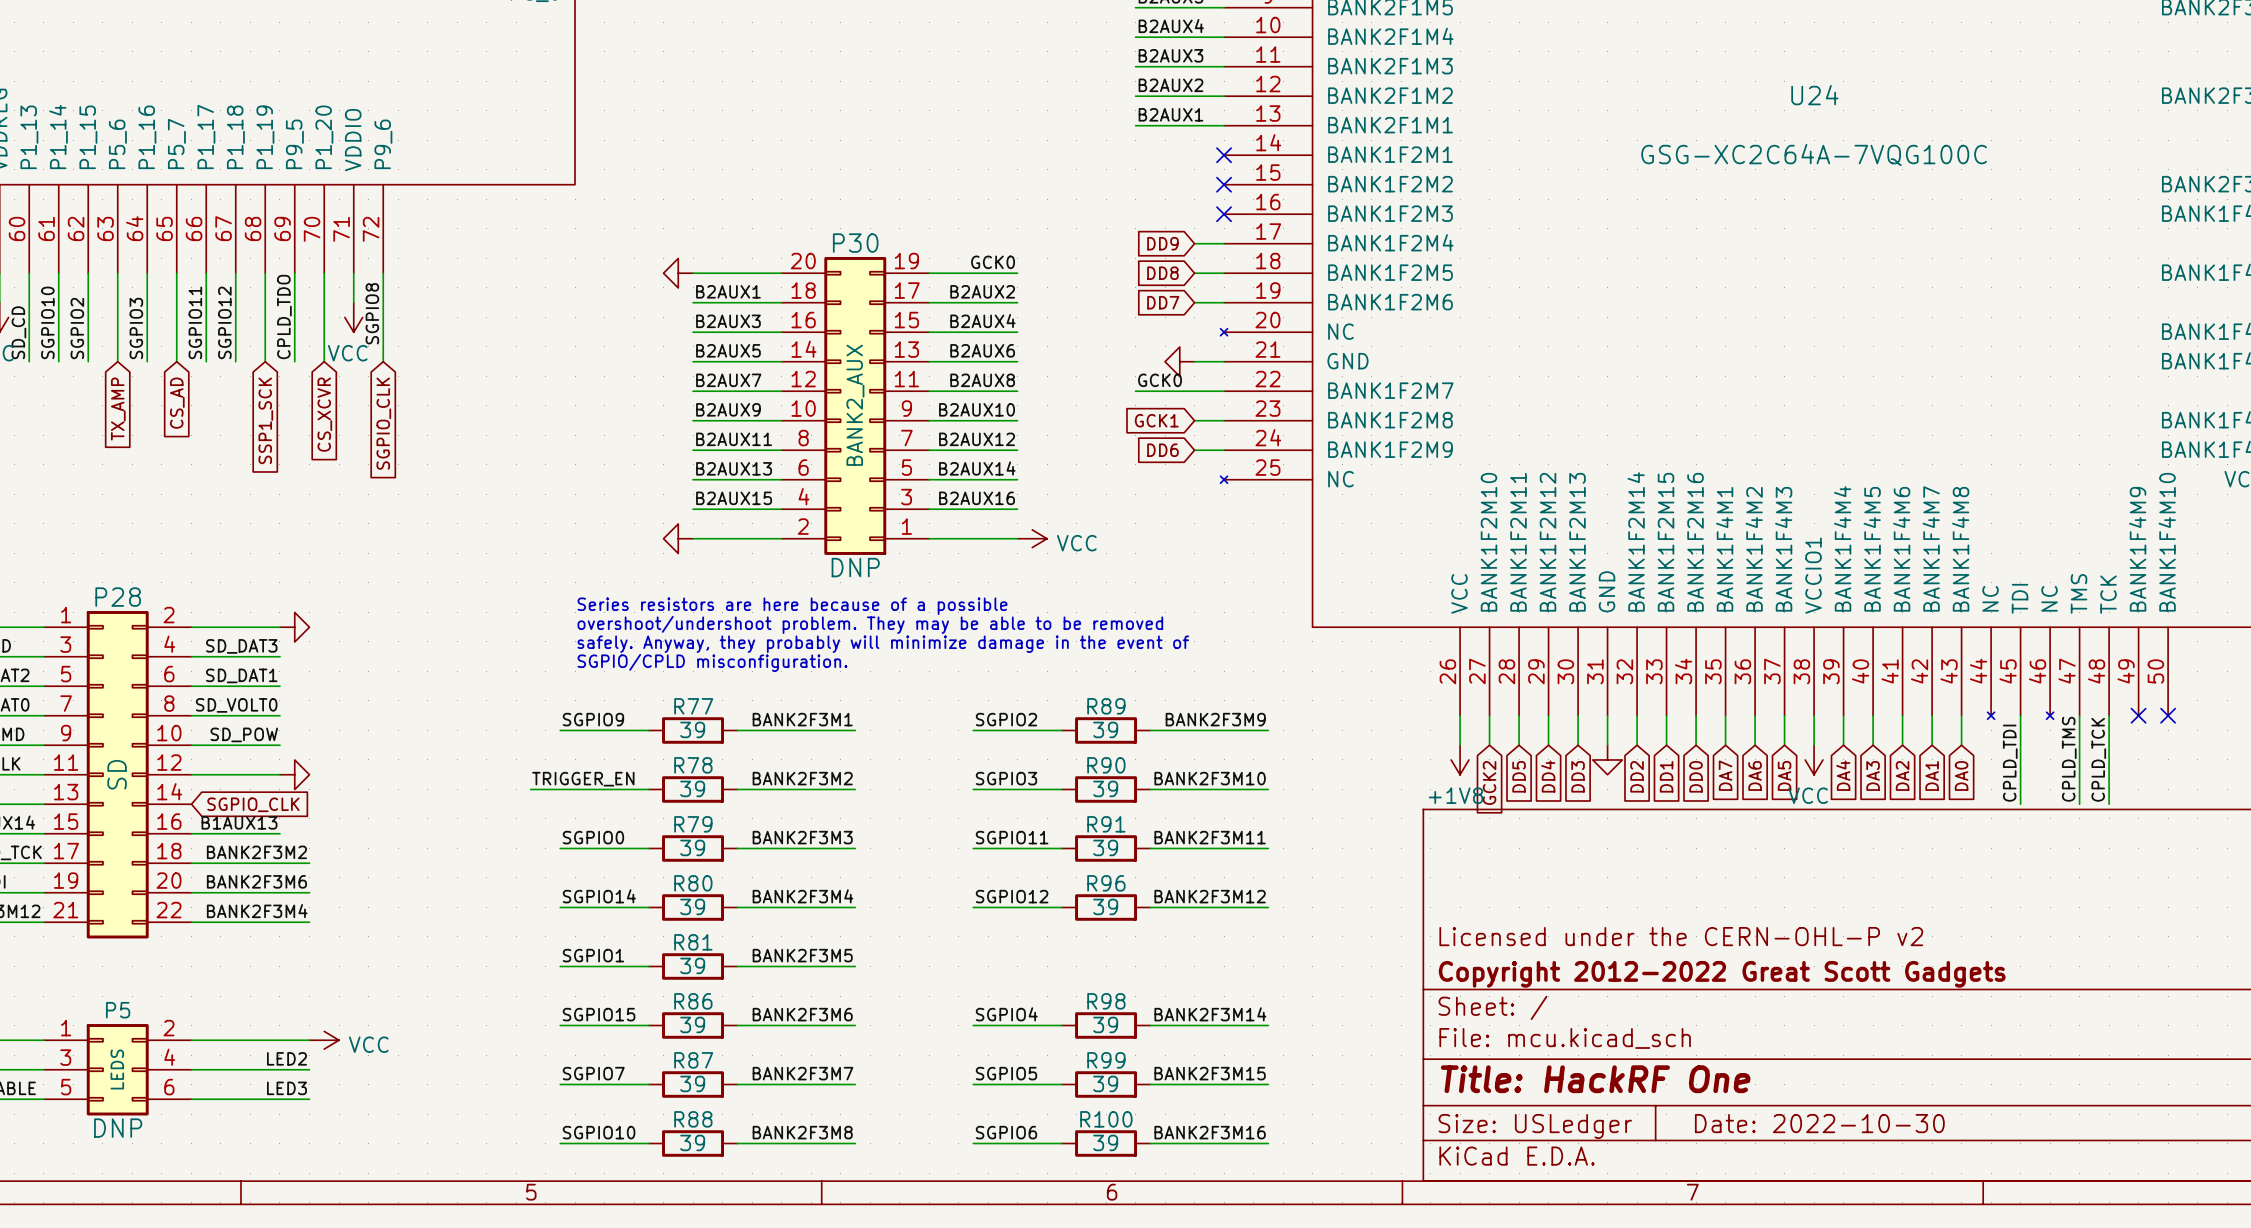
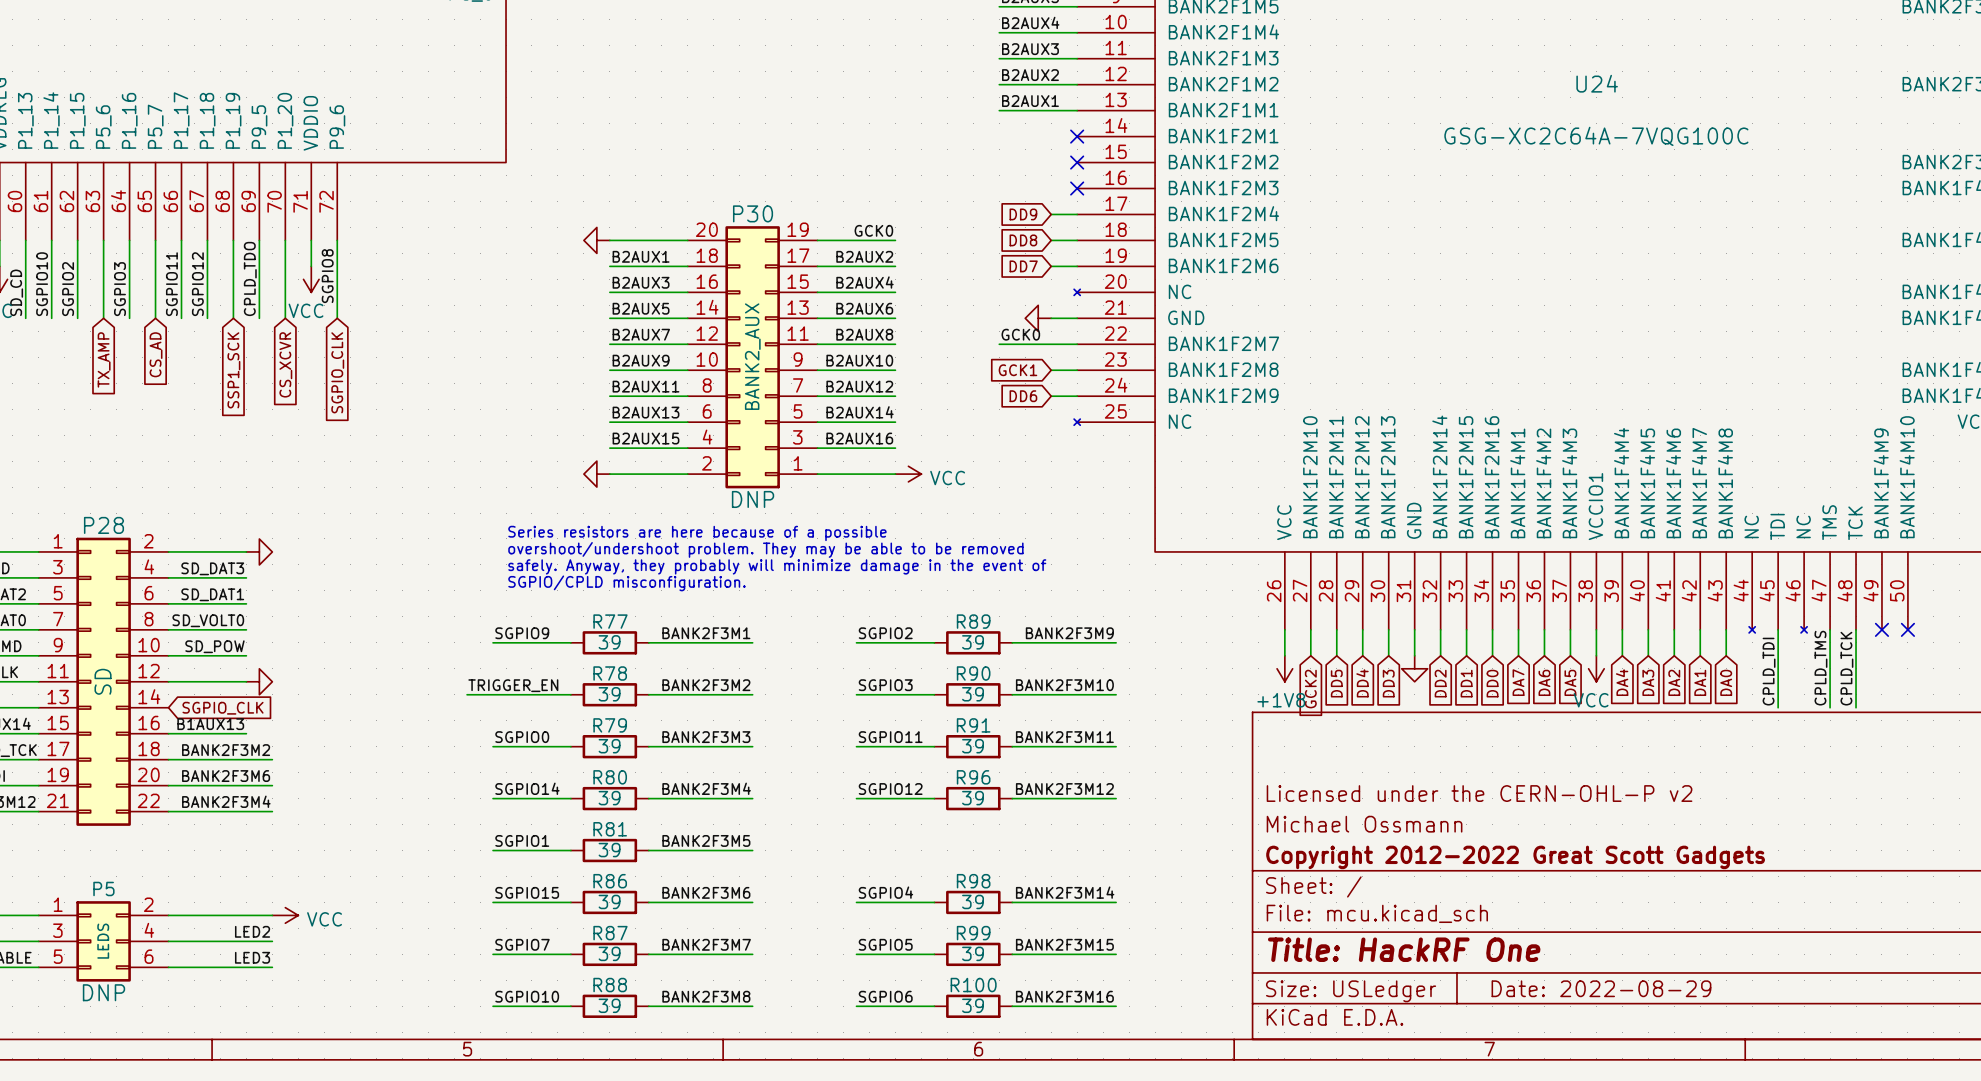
title block: none -> Licensed under the CERN-OHL-P v2 (1479, 793)
title block: Licensed under the CERN-OHL-P v2 (1681, 936) -> Michael Ossmann (1364, 824)
title block: Date: 2022-10-30 (1819, 1123) -> Date: 2022-08-29 (1601, 988)

